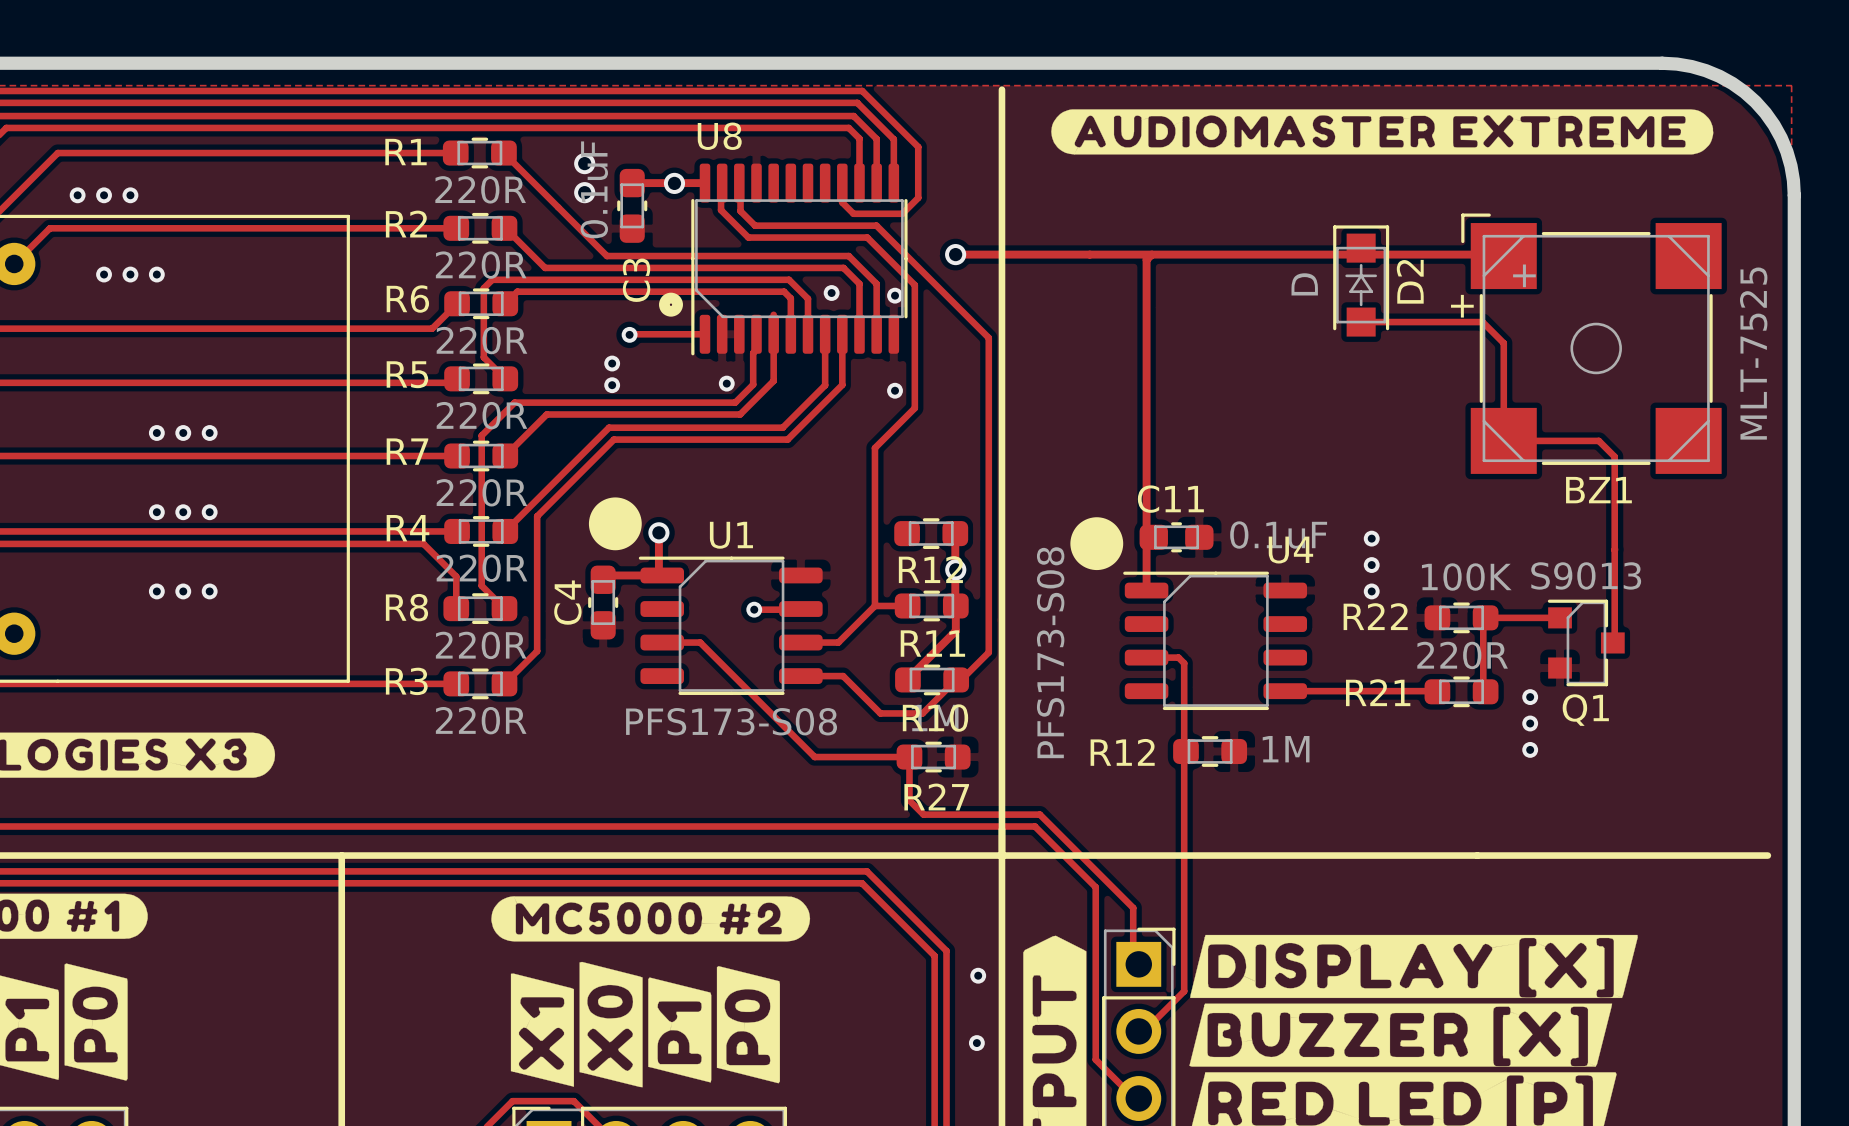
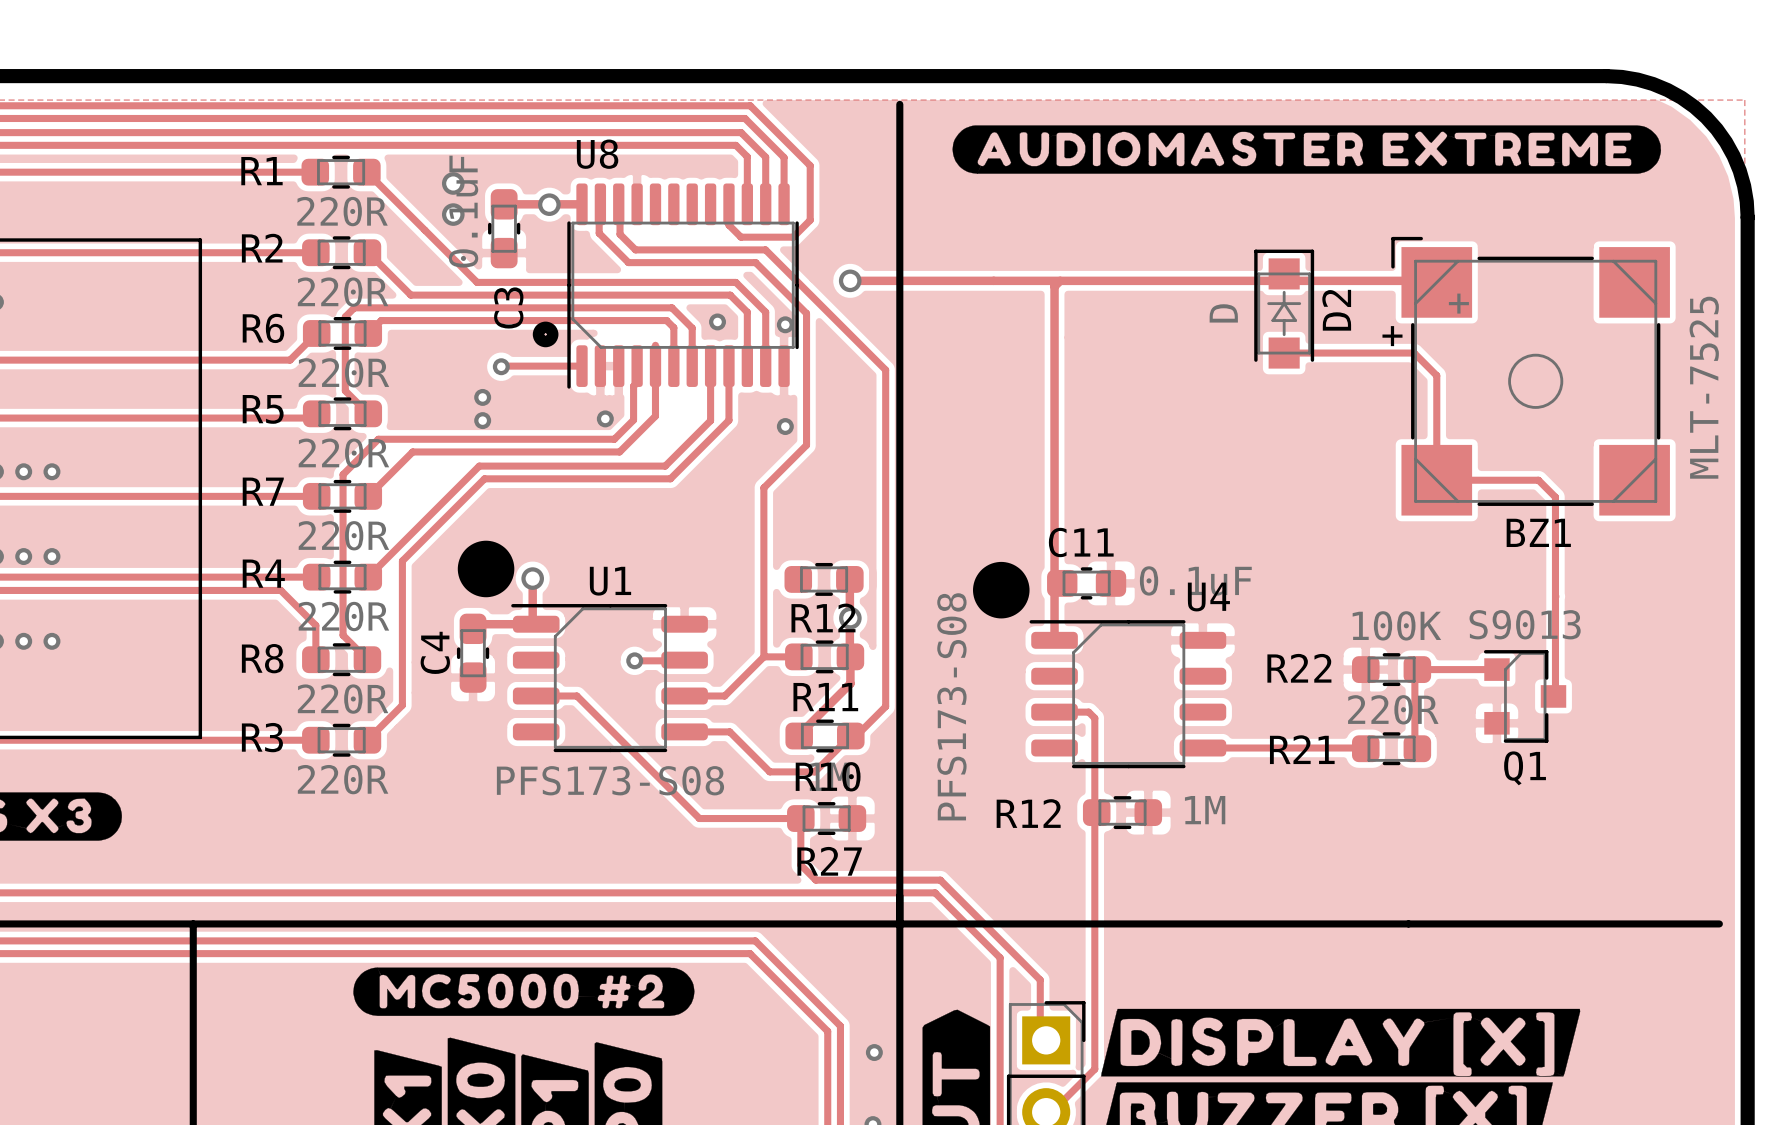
via: (1371, 538) -> none
via: (1371, 565) -> none
via: (1371, 591) -> none
via: (1530, 697) -> none
via: (1530, 723) -> none
via: (1530, 749) -> none

